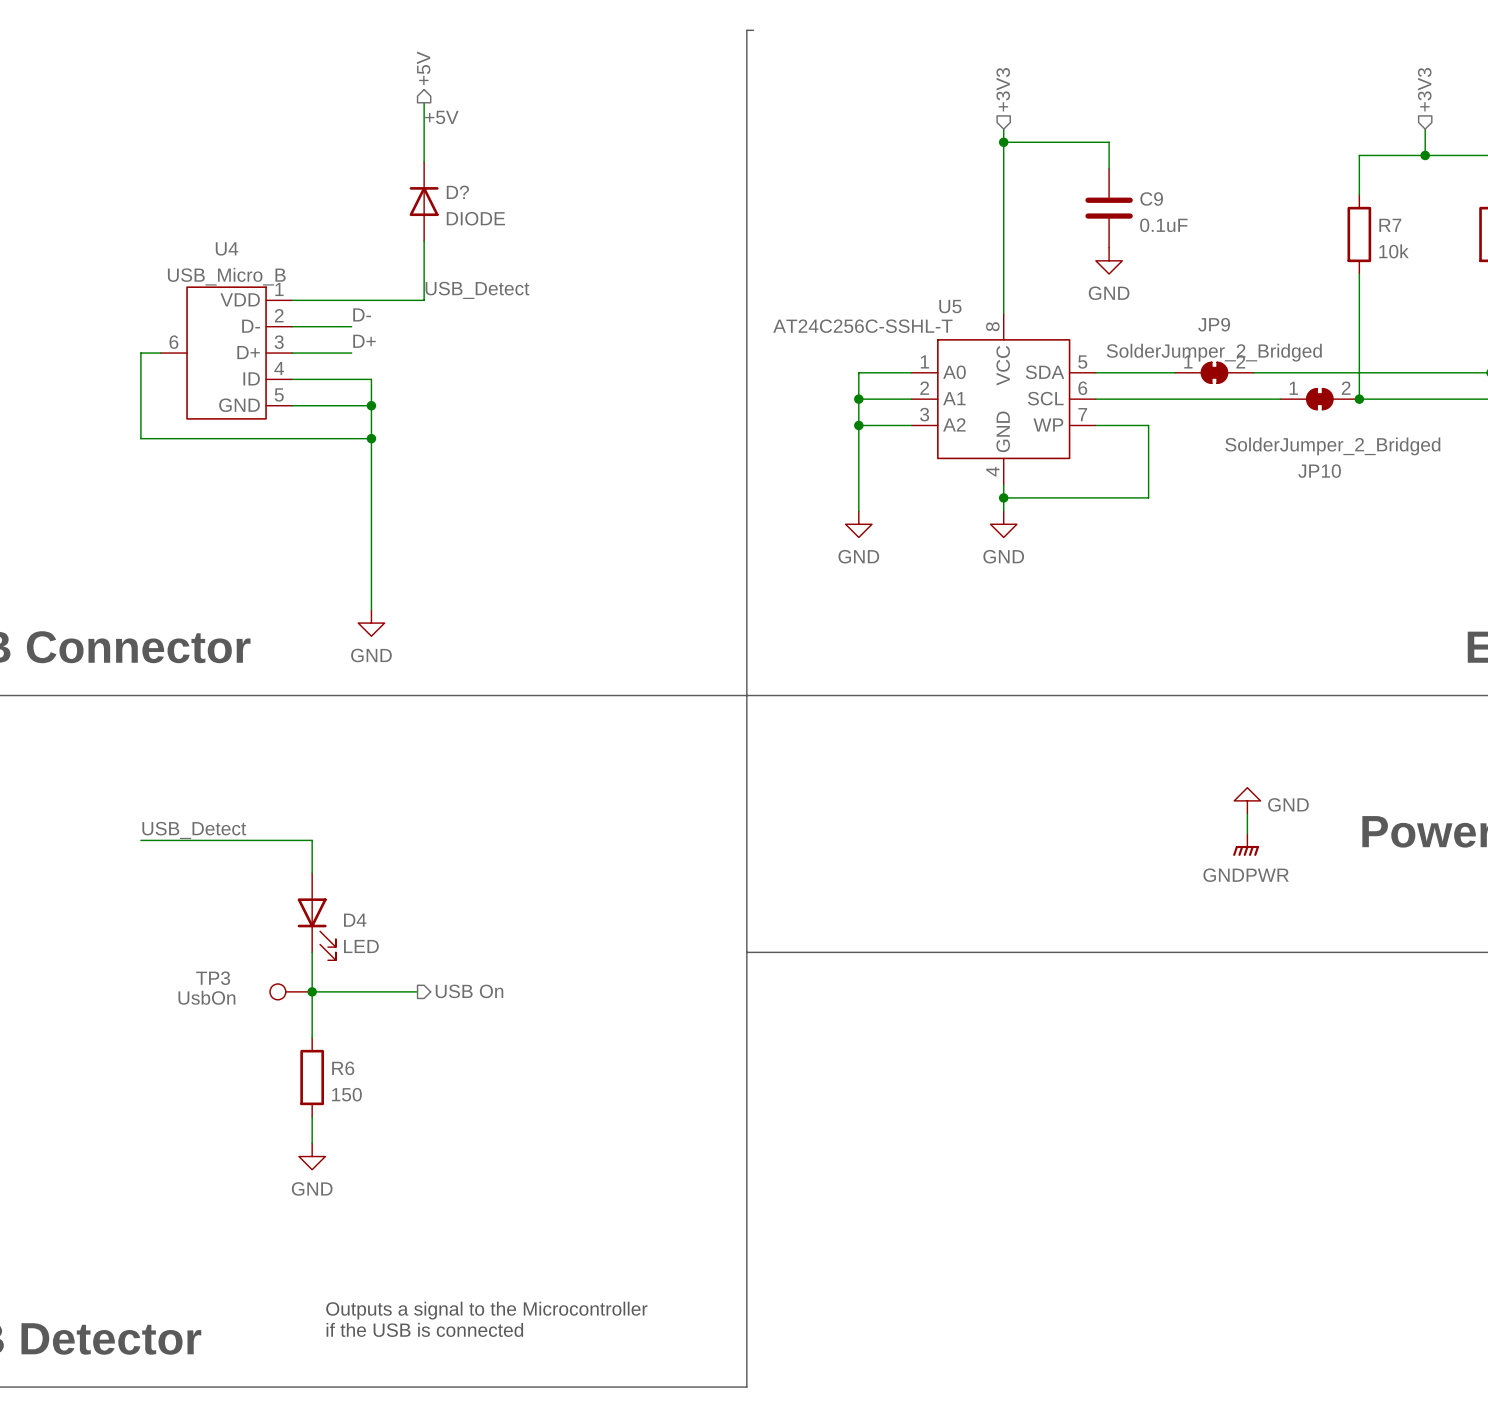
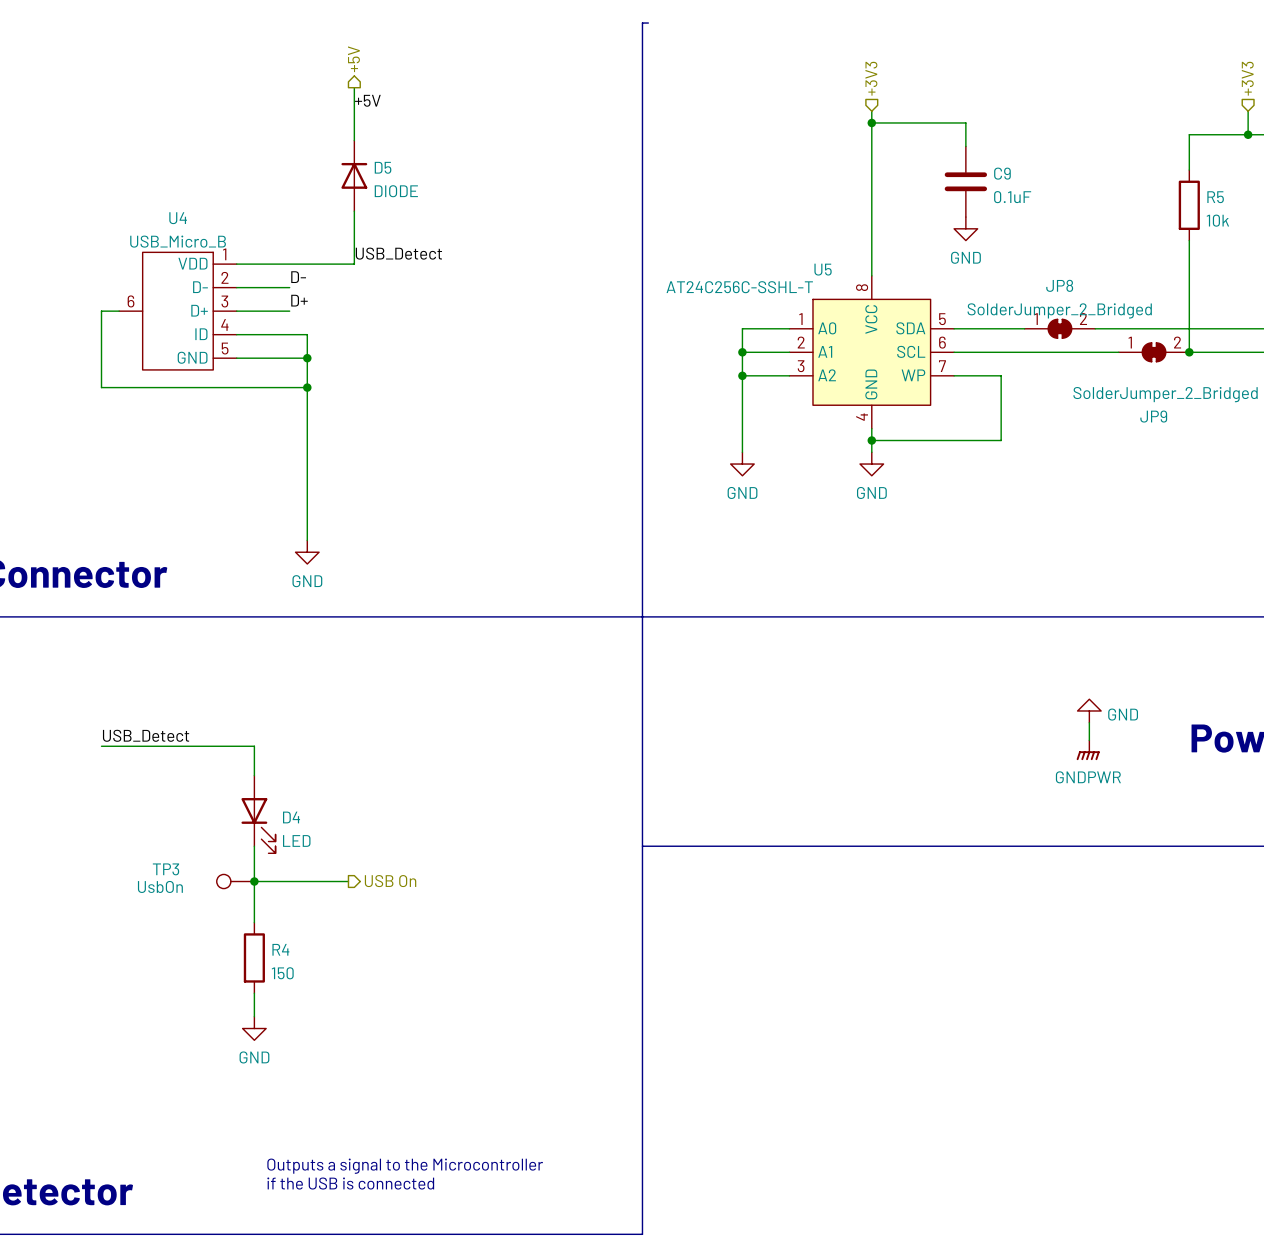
D? name: D? (457, 192) -> D5 (383, 167)
R7 name: R7 (1390, 225) -> R5 (1215, 197)
JP9 name: JP9 (1214, 324) -> JP8 (1059, 285)
JP10 name: JP10 (1319, 471) -> JP9 (1153, 416)
R6 name: R6 (343, 1068) -> R4 (280, 949)

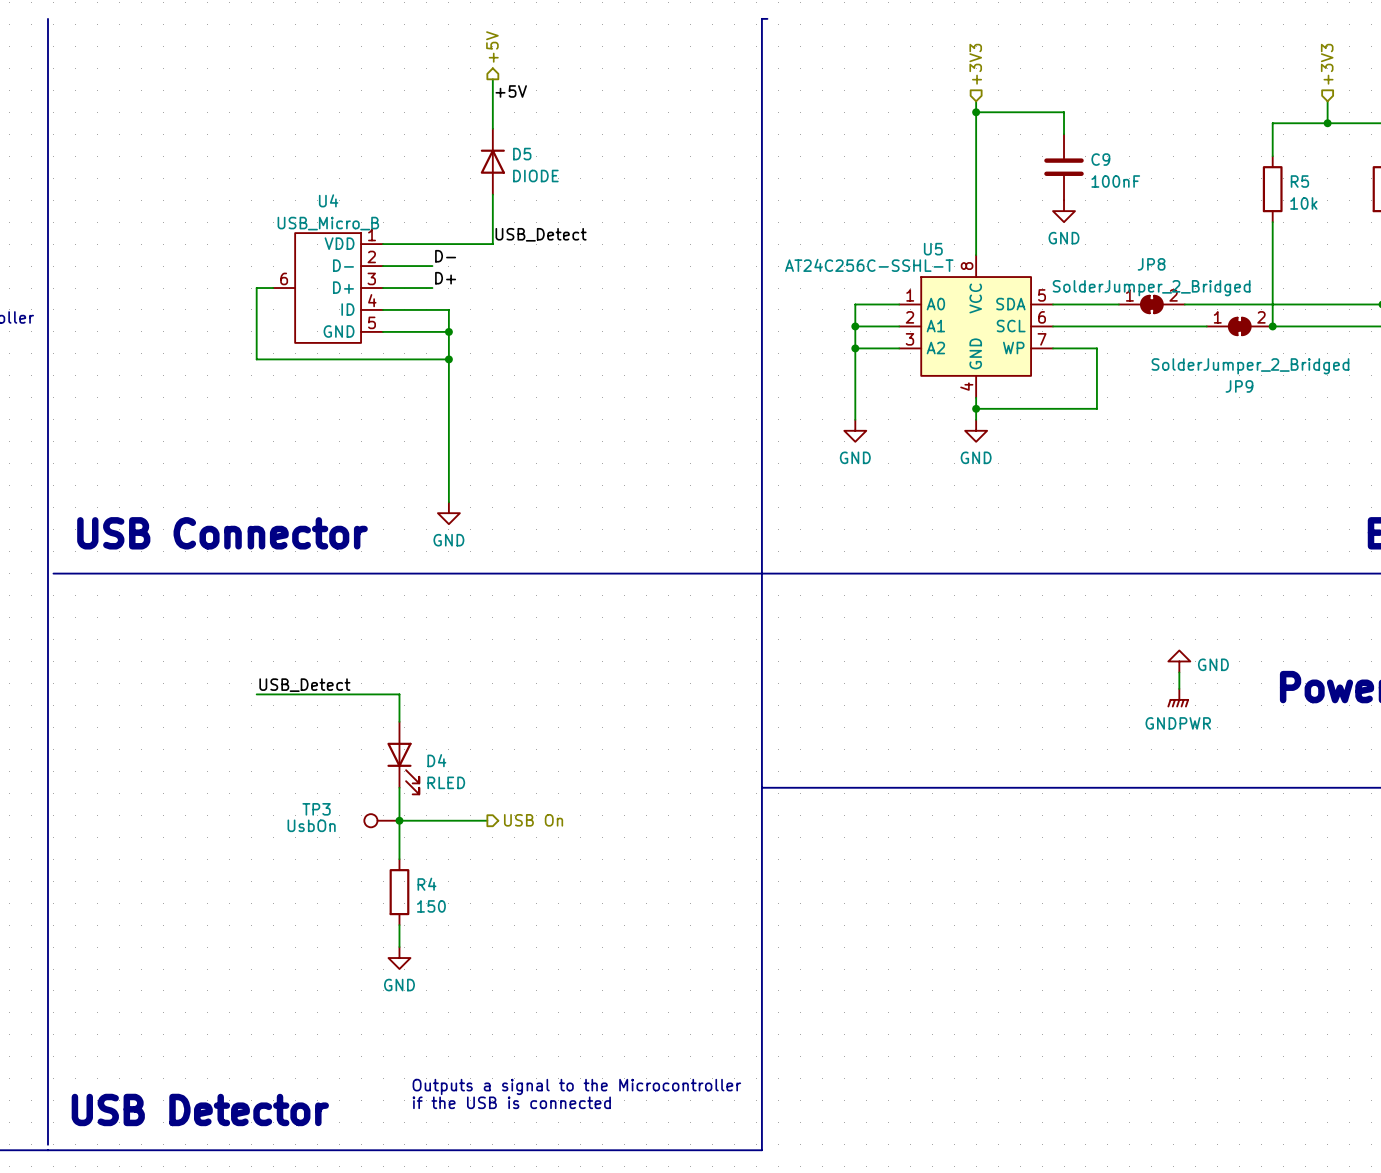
C9 value: 0.1uF (1012, 197) -> 100nF (1115, 181)
D4 value: LED (296, 840) -> RLED (446, 782)

